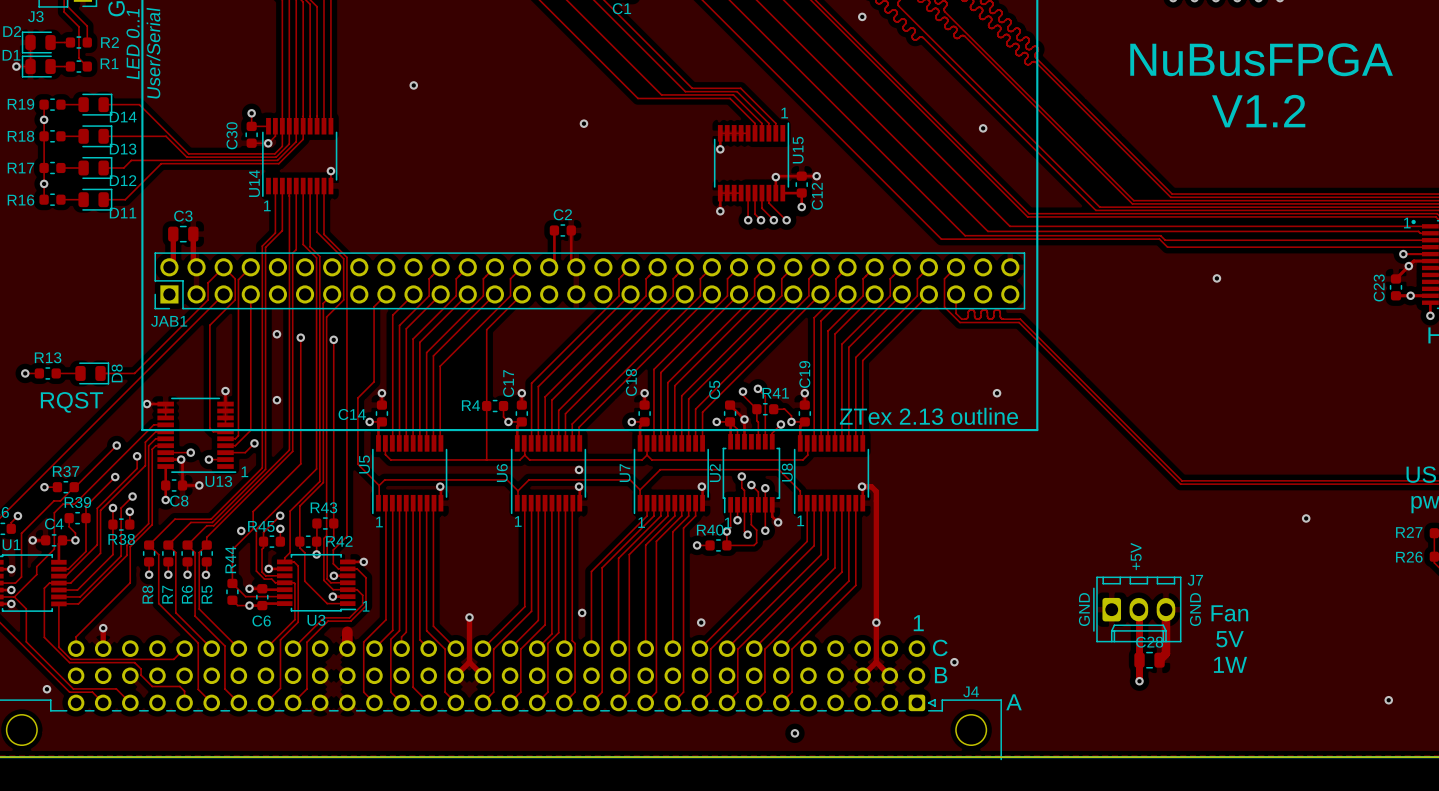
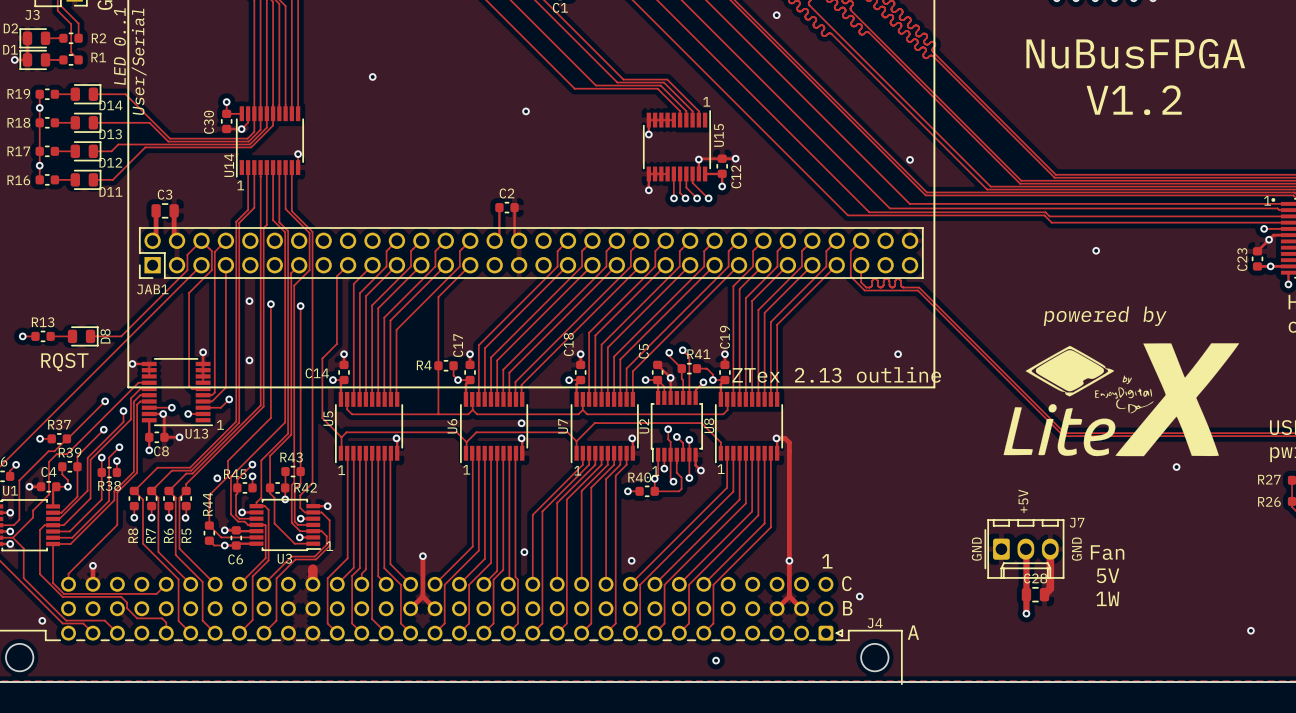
via position: (983, 128) -> (910, 159)
text: none -> powered by (1105, 316)
drawing: none -> [1003, 343, 1240, 457]

